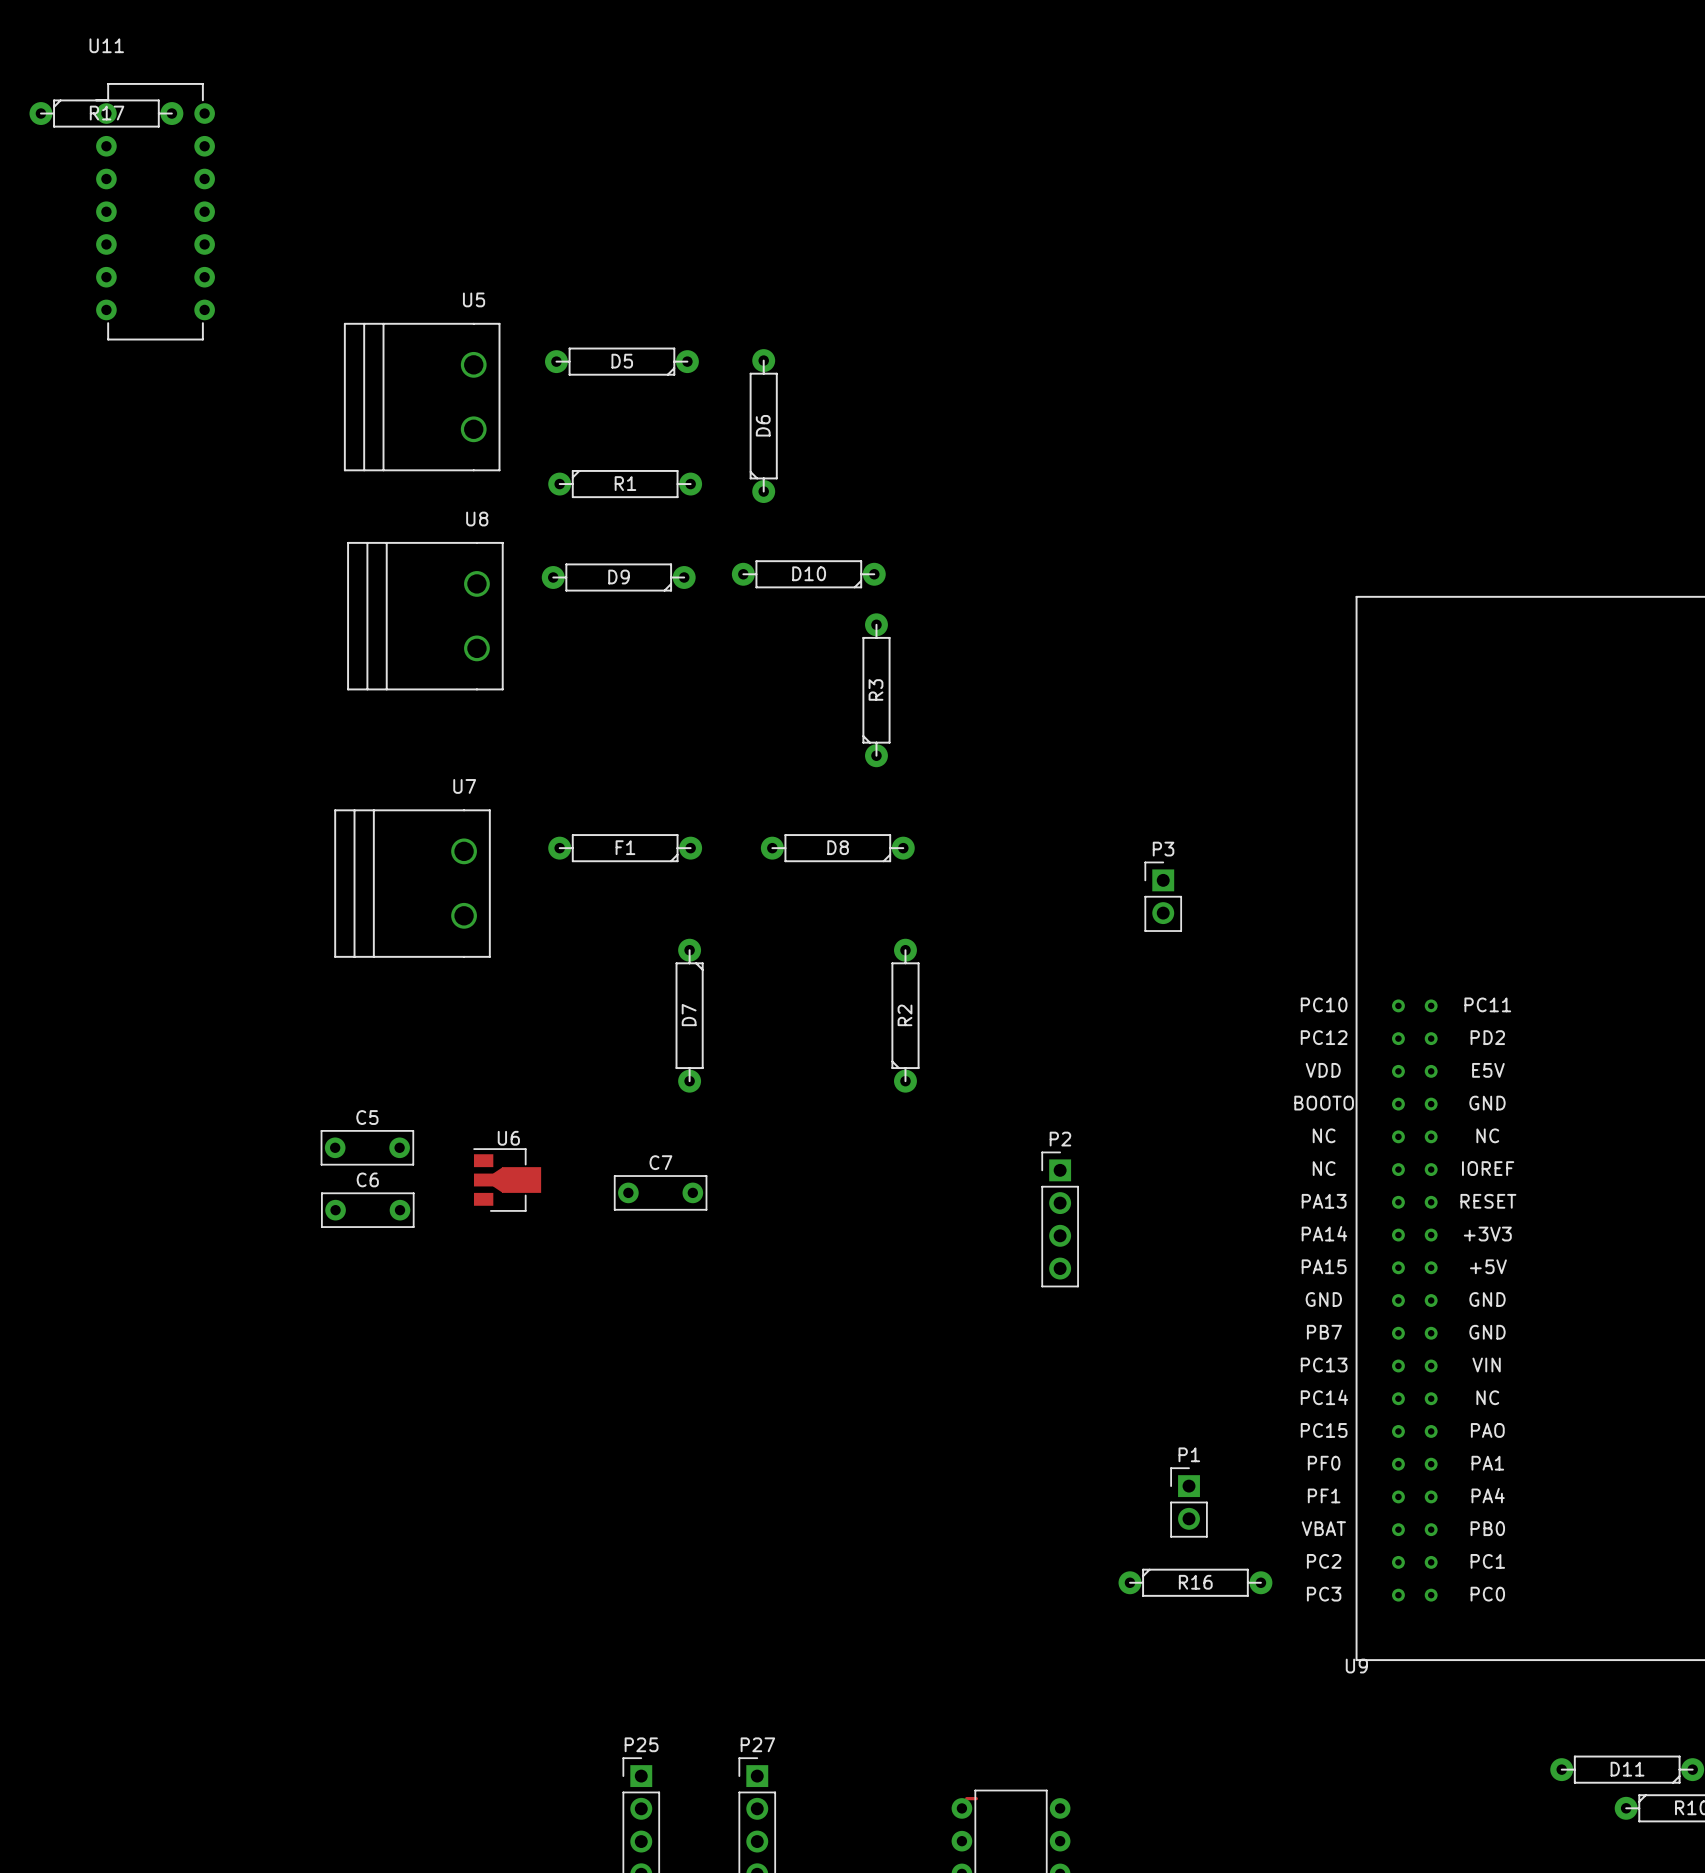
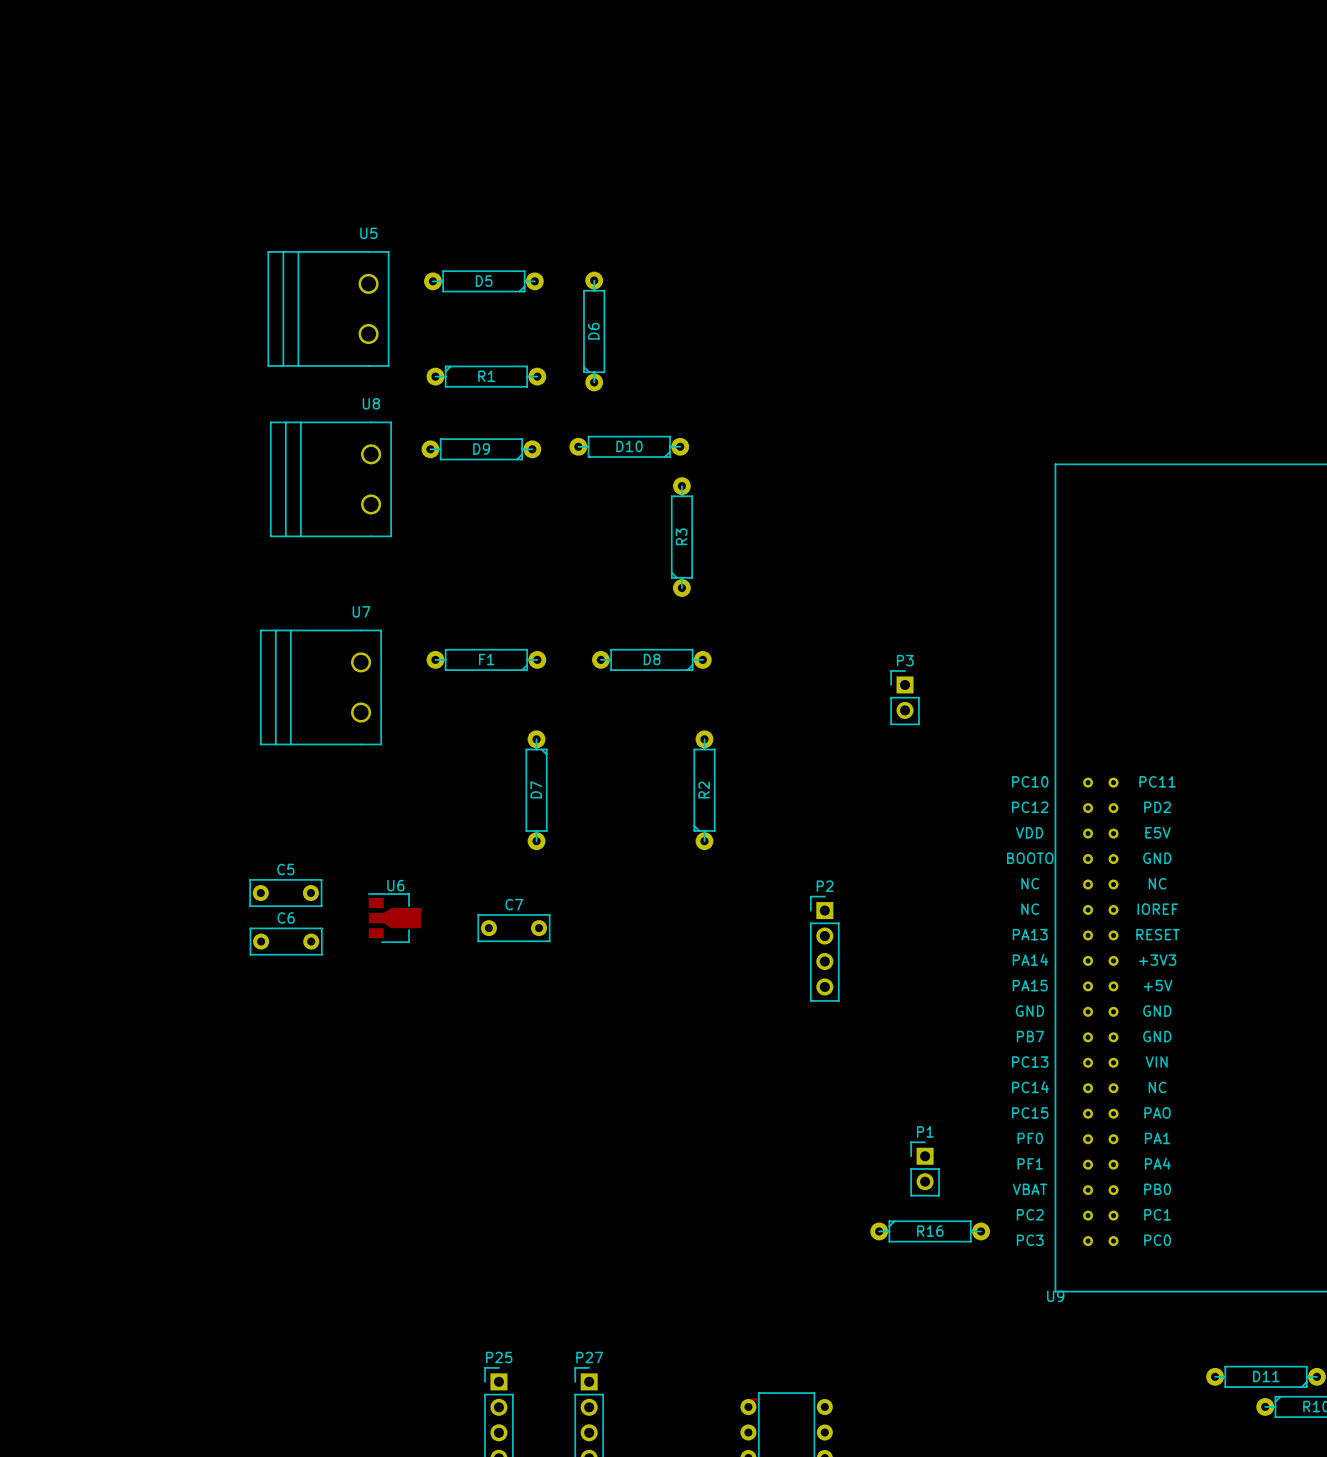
R17: (106, 113) -> none
U11: (155, 211) -> none

